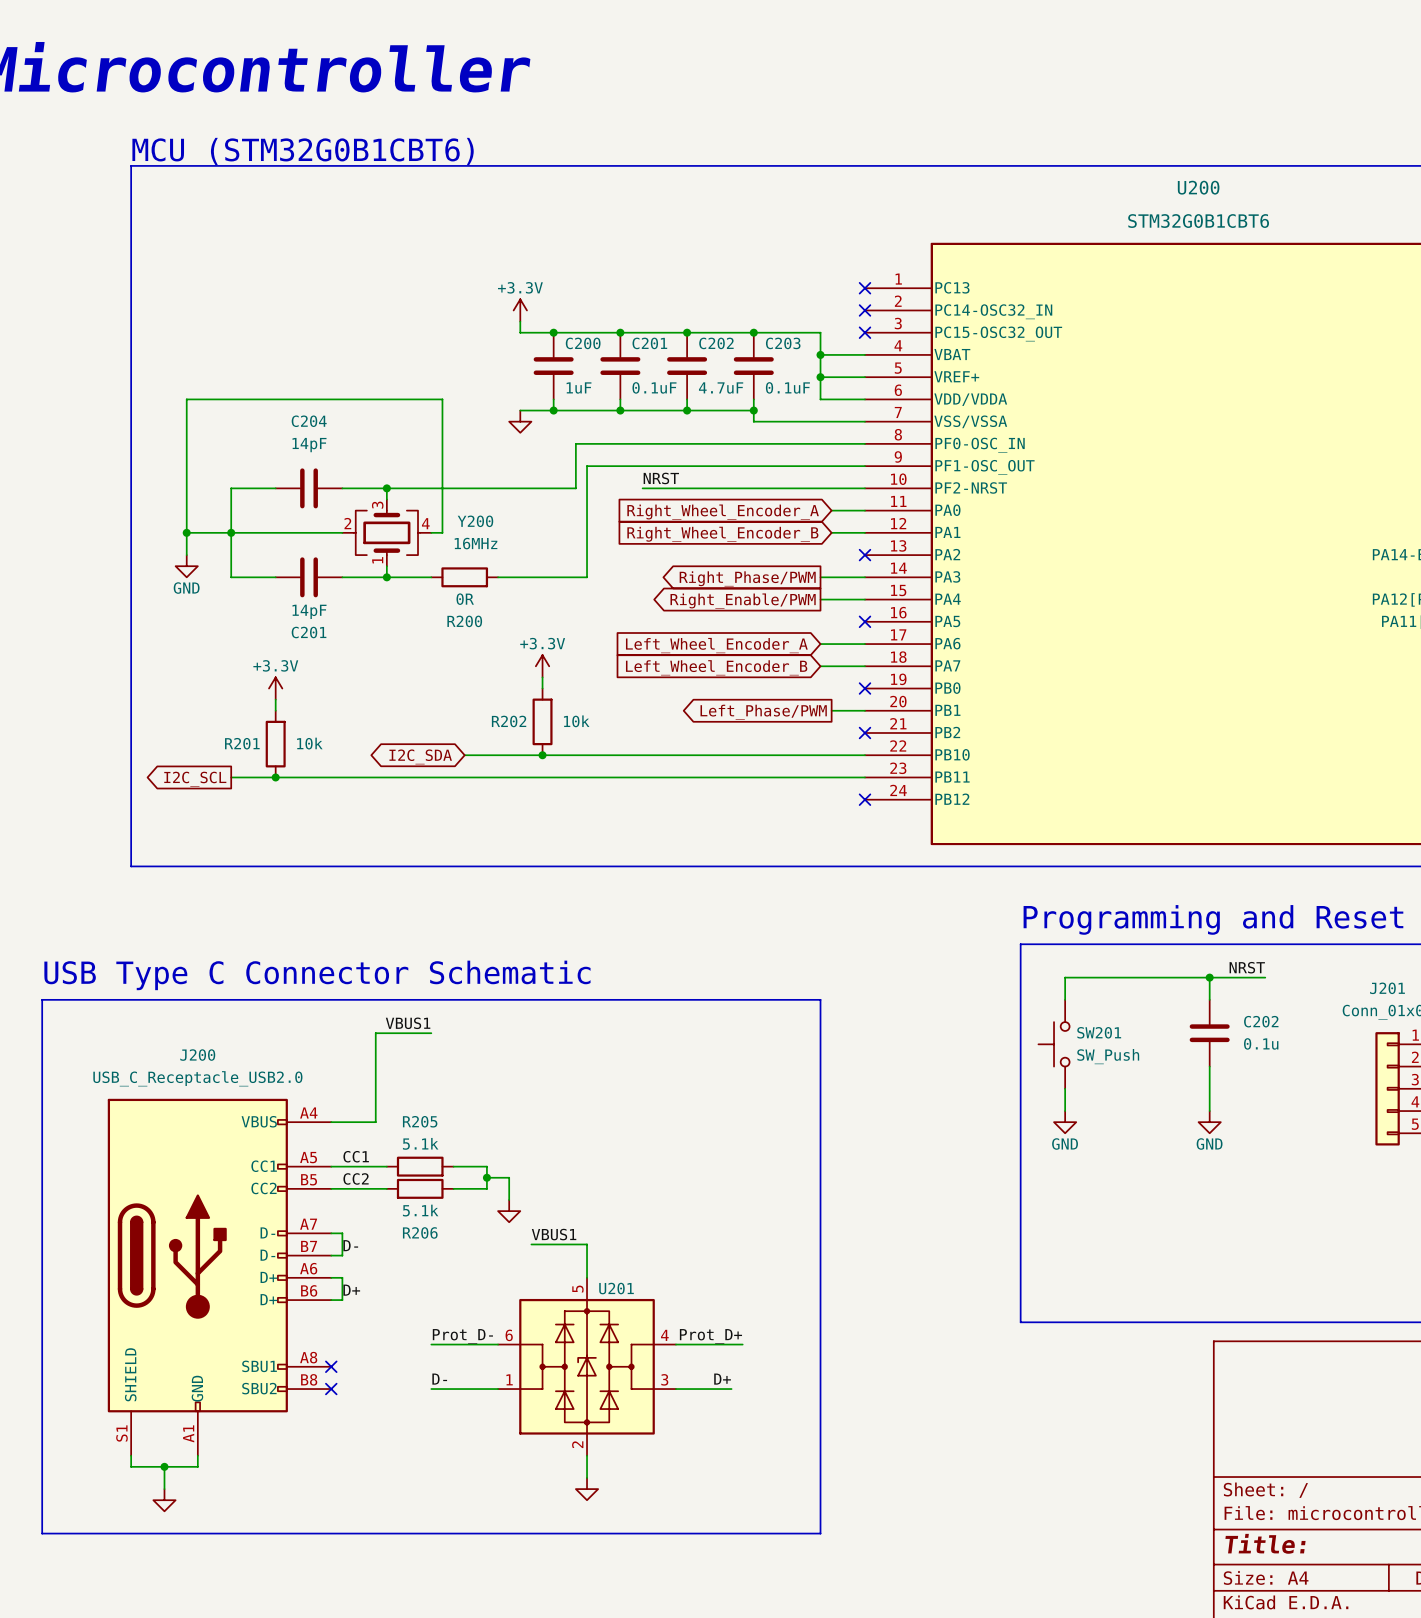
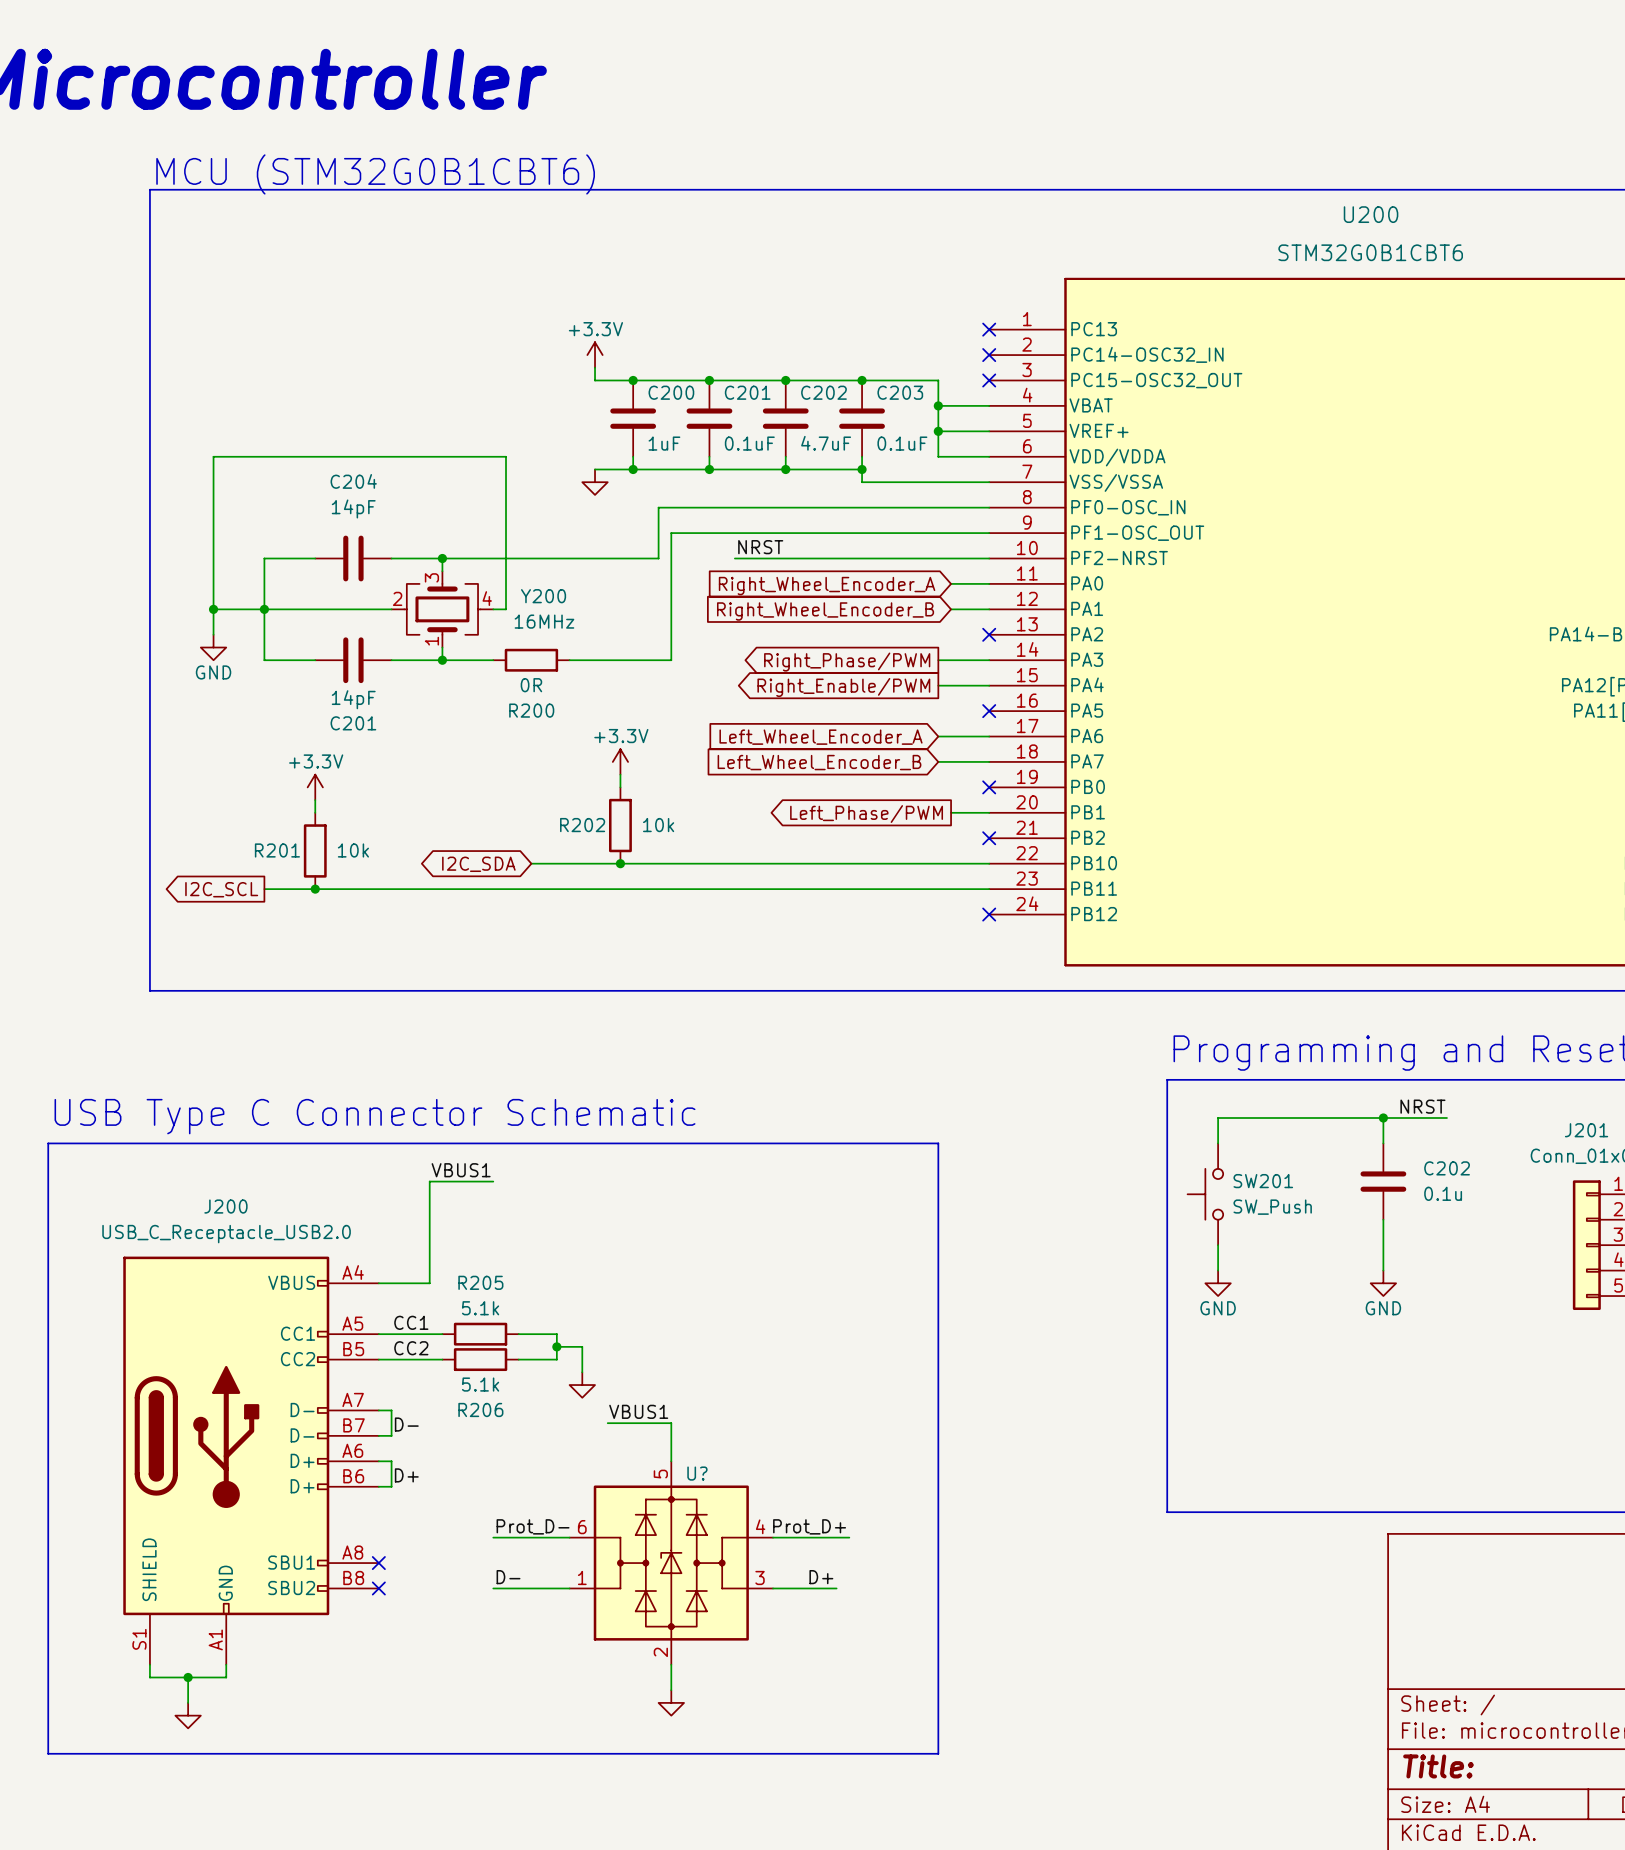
U201 name: U201 (616, 1288) -> U? (697, 1473)

